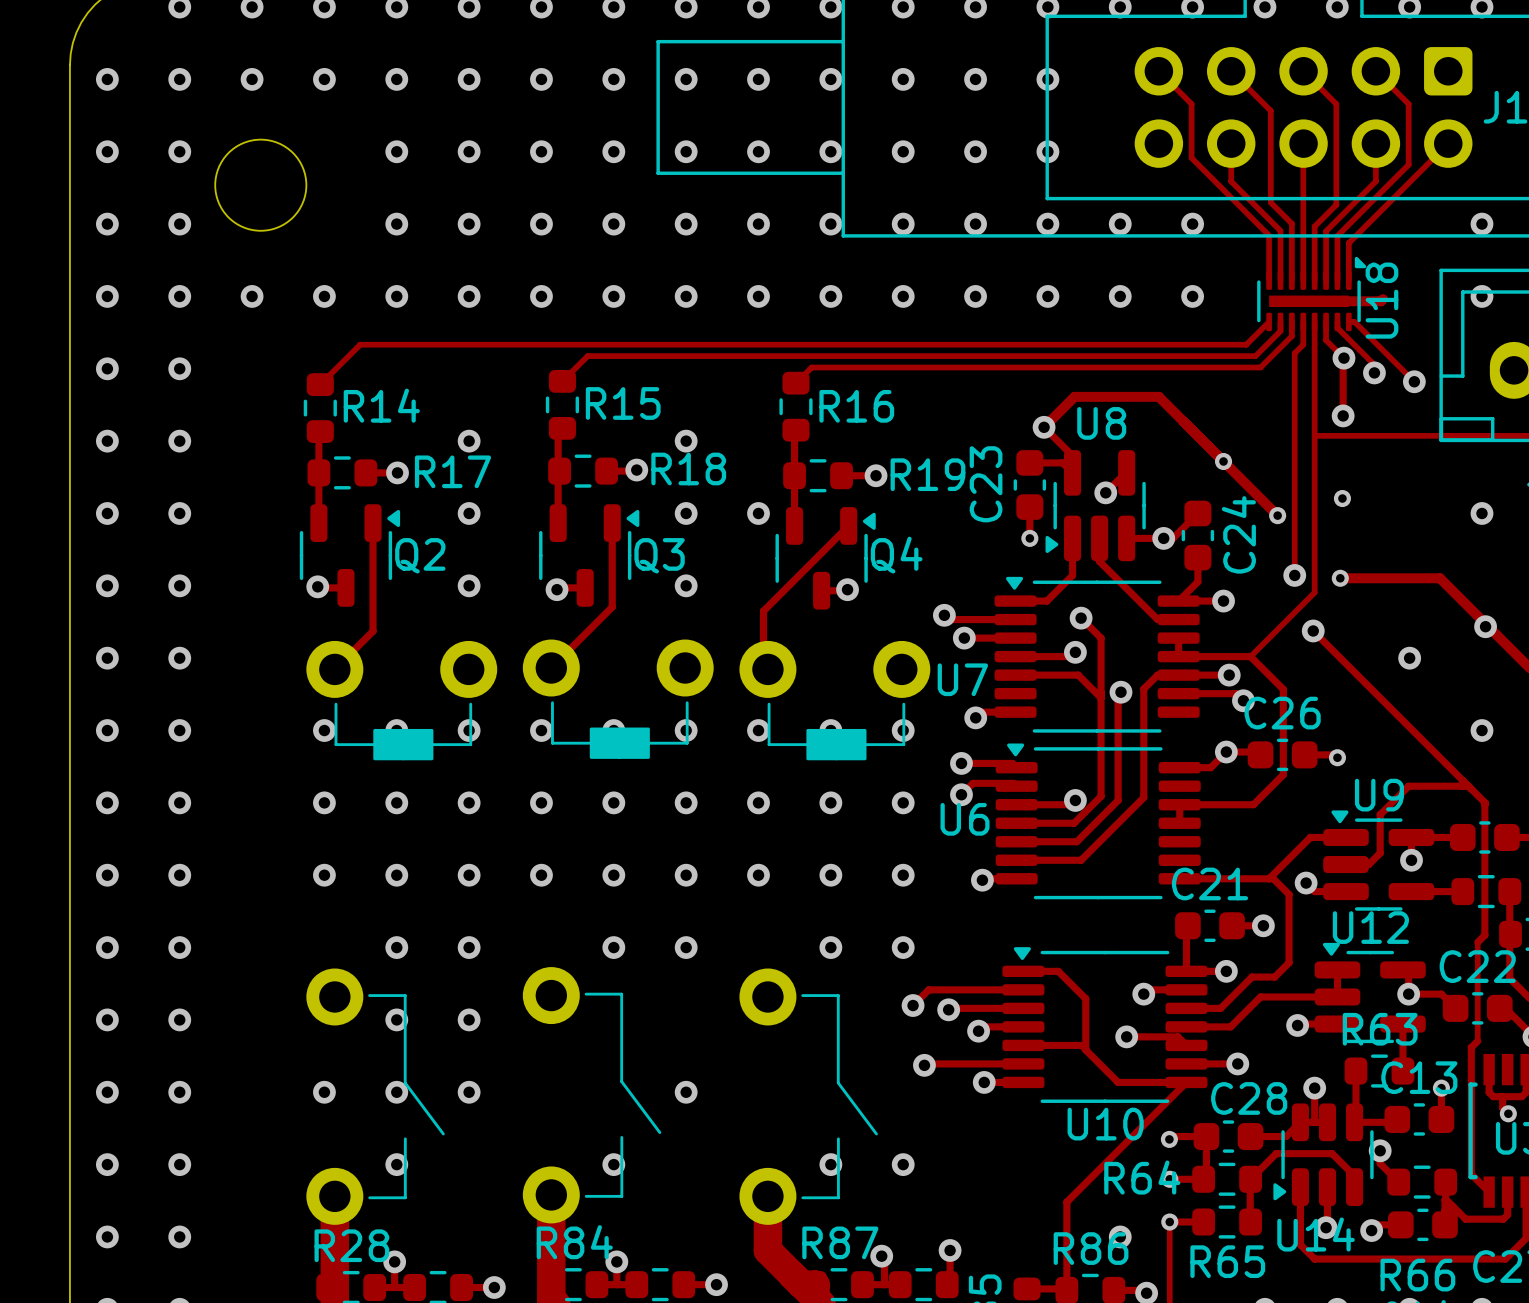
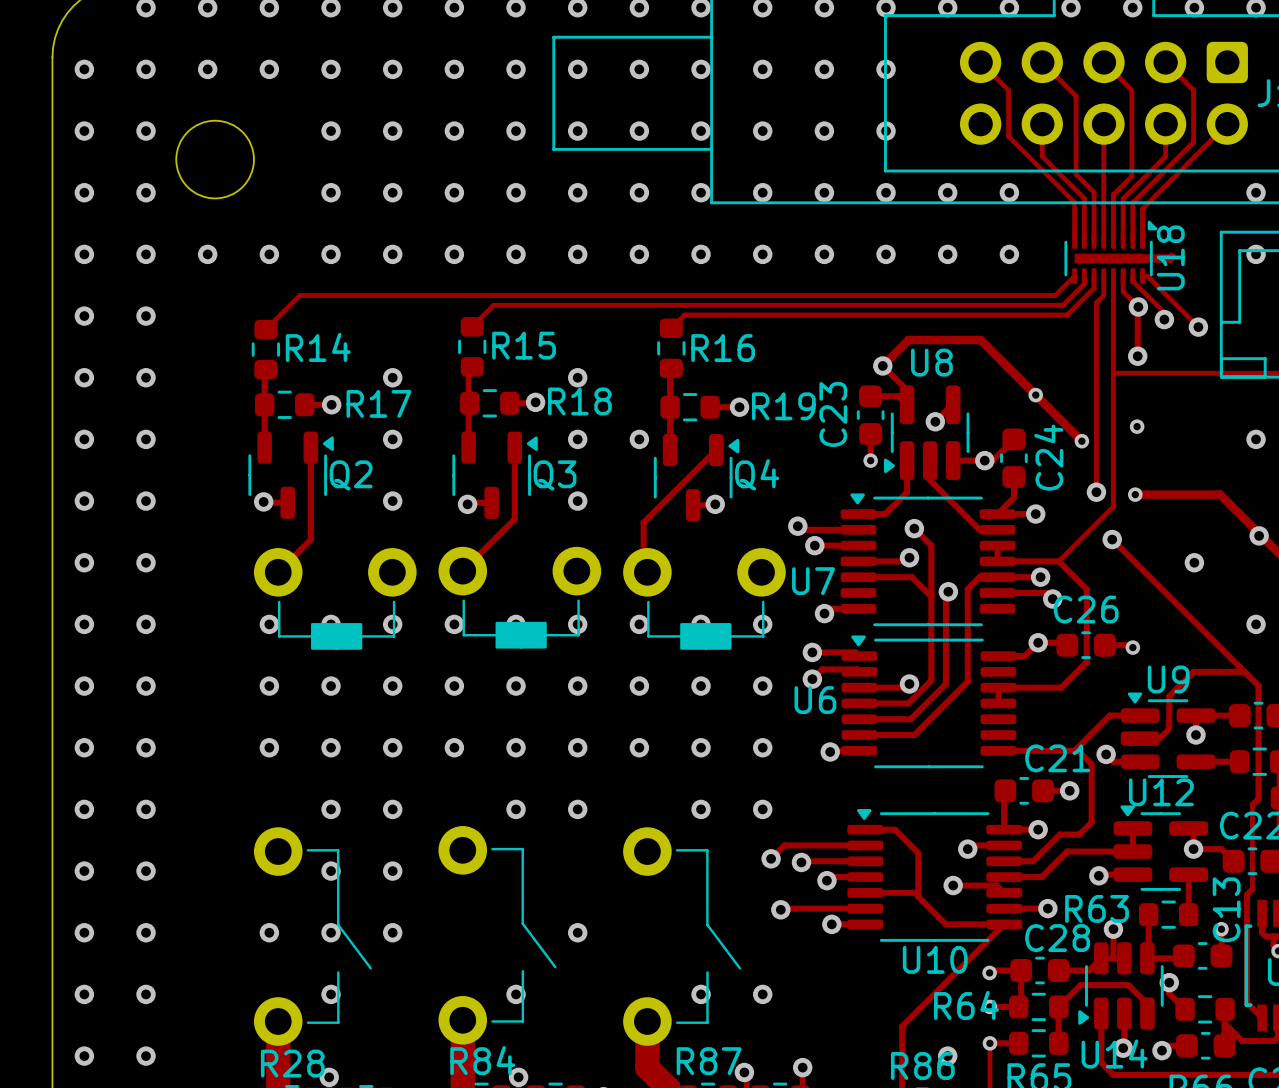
C21 name position: C21 (1210, 883) -> C21 (1057, 758)
R63 name position: R63 (1380, 1029) -> R63 (1097, 908)
C13 name rotation: 0° (1419, 1077) -> 90° counterclockwise (1226, 909)

